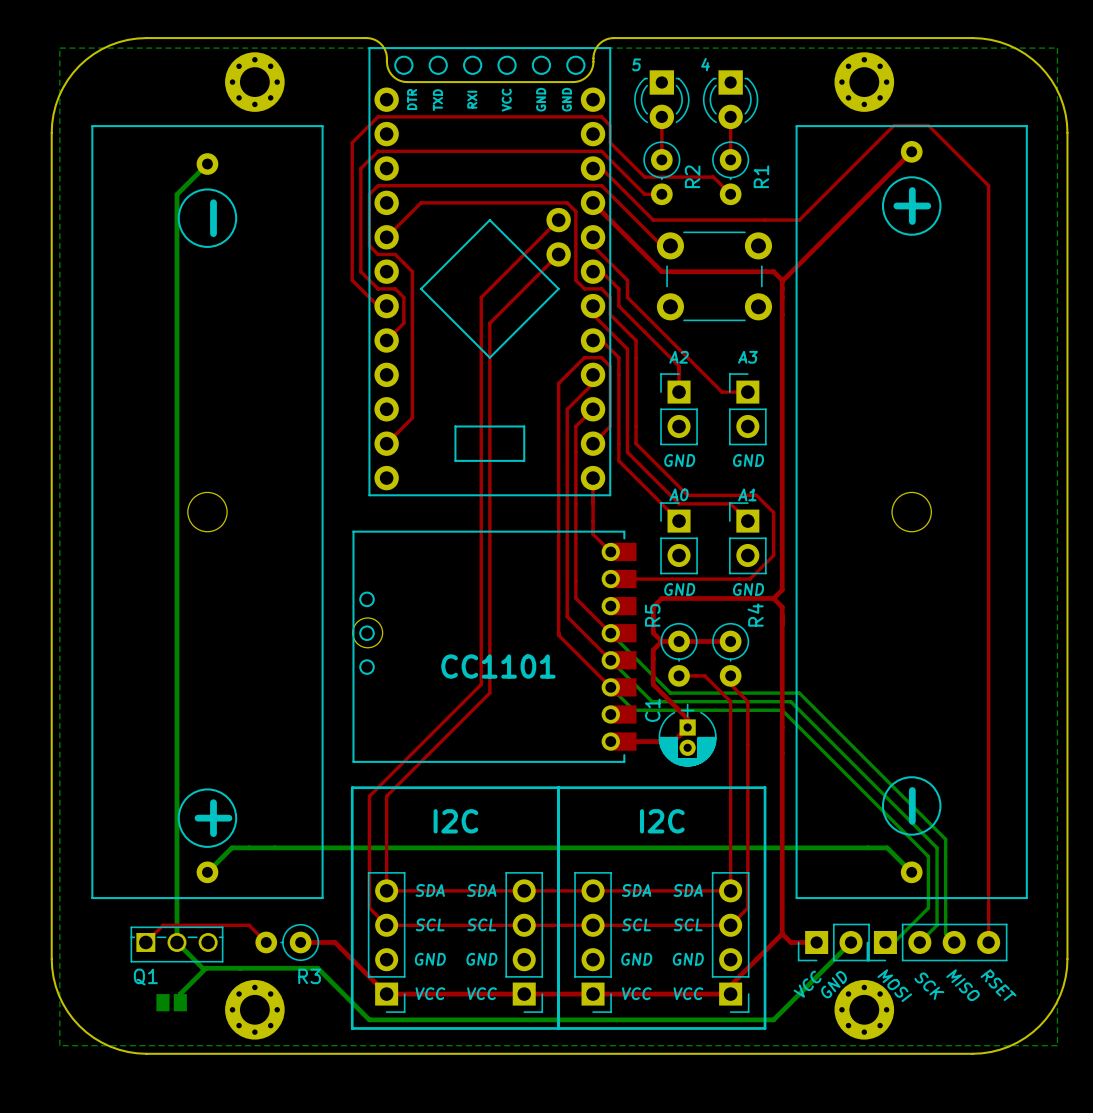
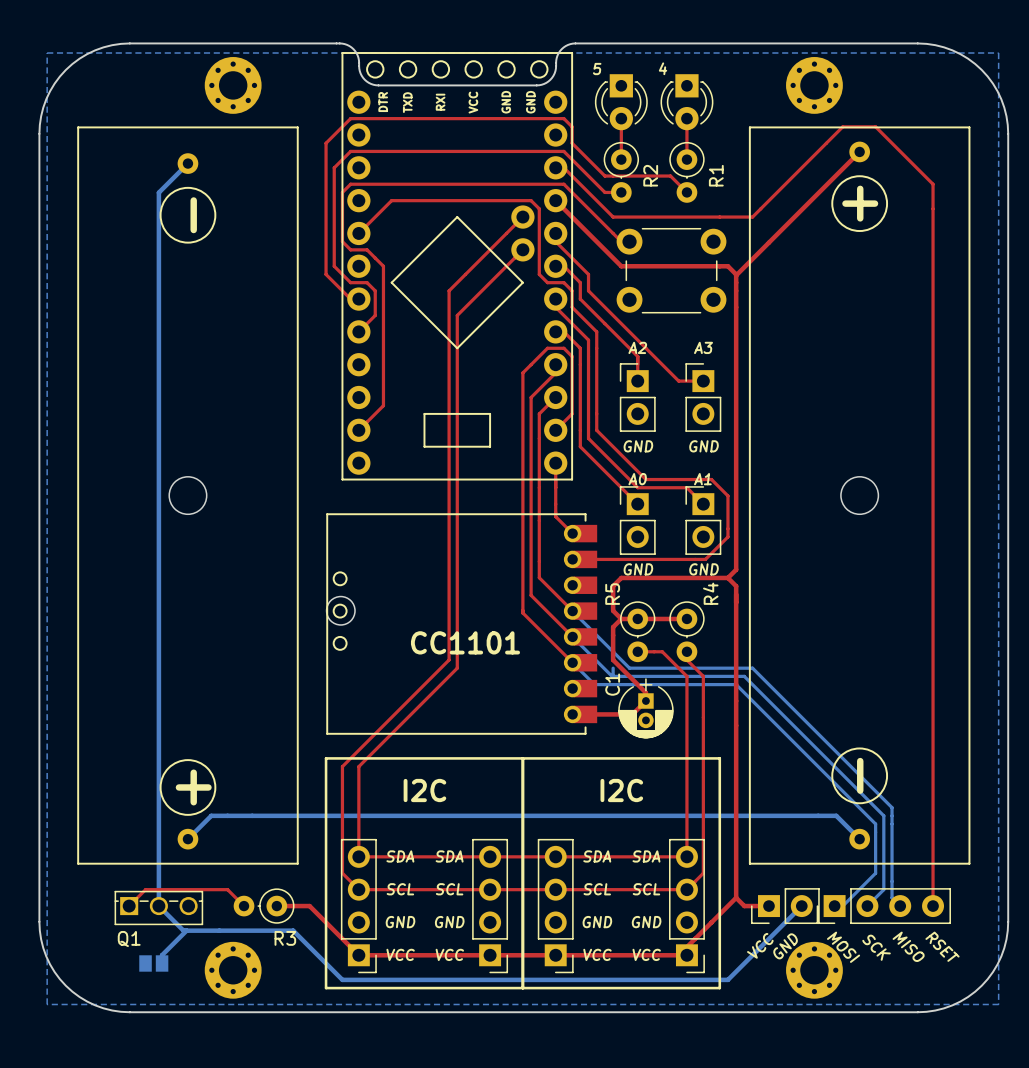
bottom track: none -> (613, 668) (613, 676)

